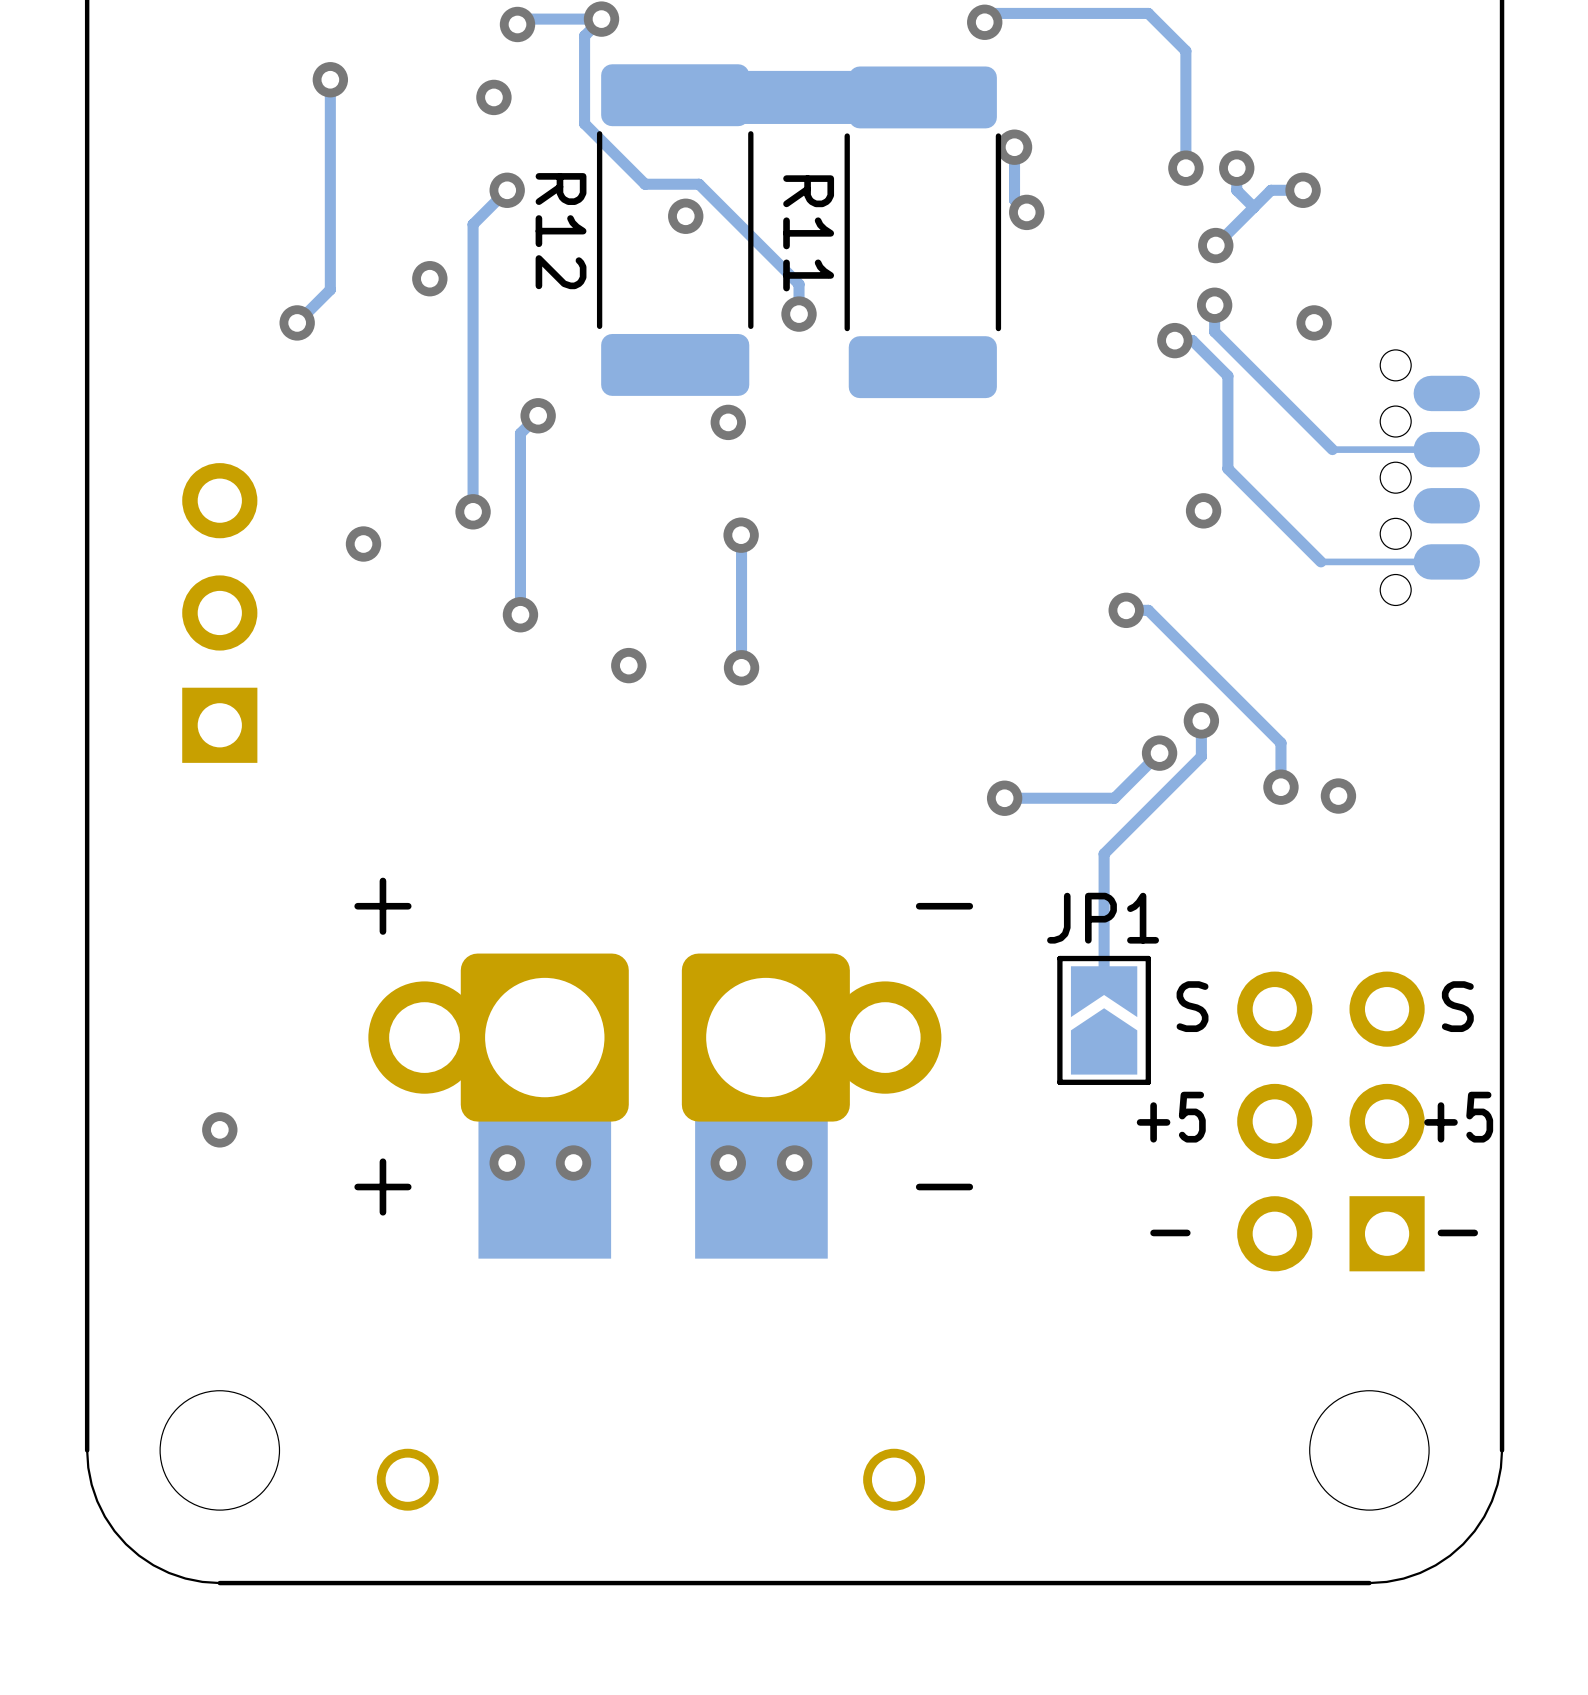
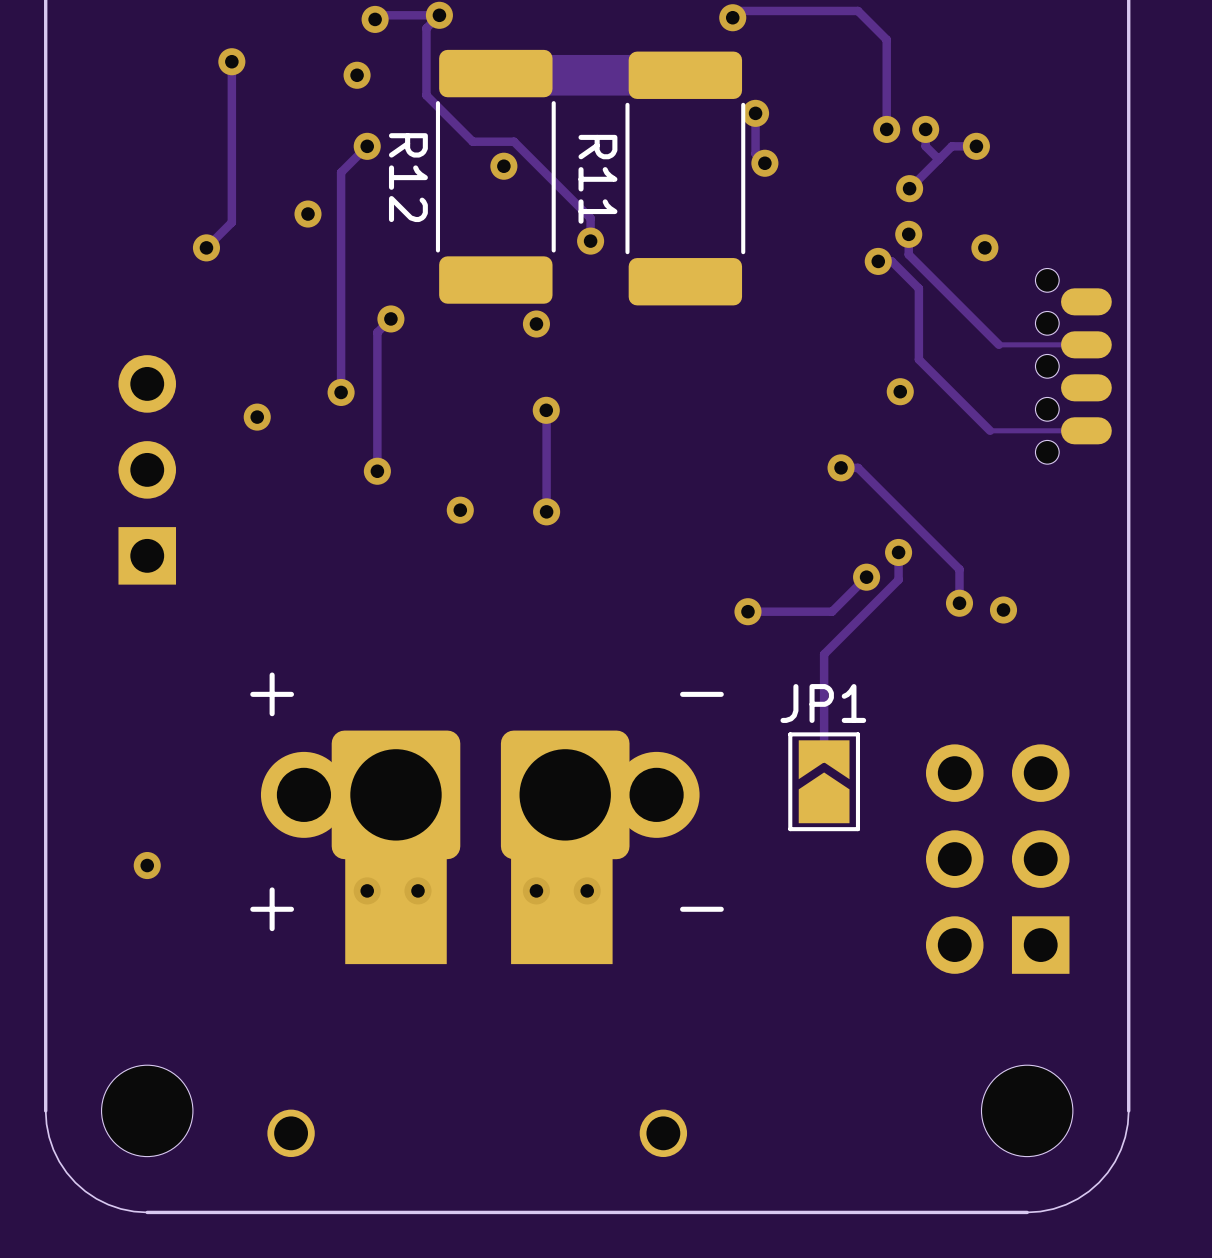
text: S (1192, 1006) -> none
text: S (1457, 1006) -> none
text: +5 (1171, 1117) -> none
text: +5 (1458, 1117) -> none
text: - (1170, 1232) -> none
text: - (1457, 1232) -> none

